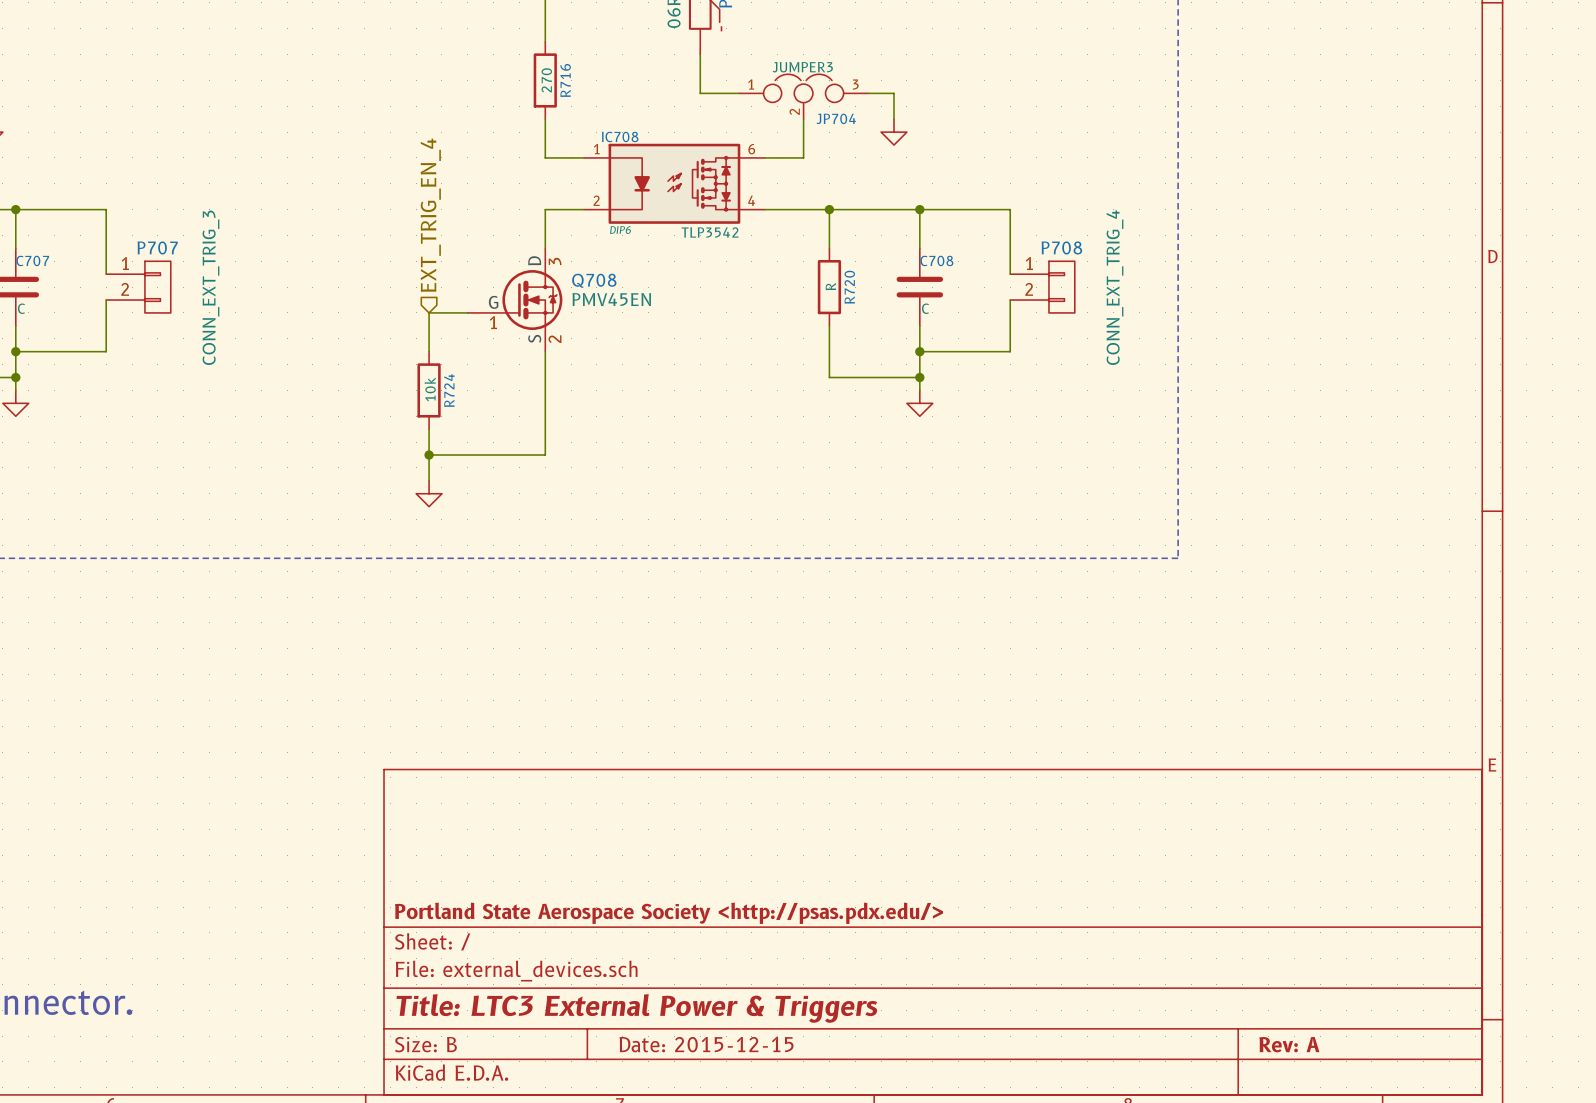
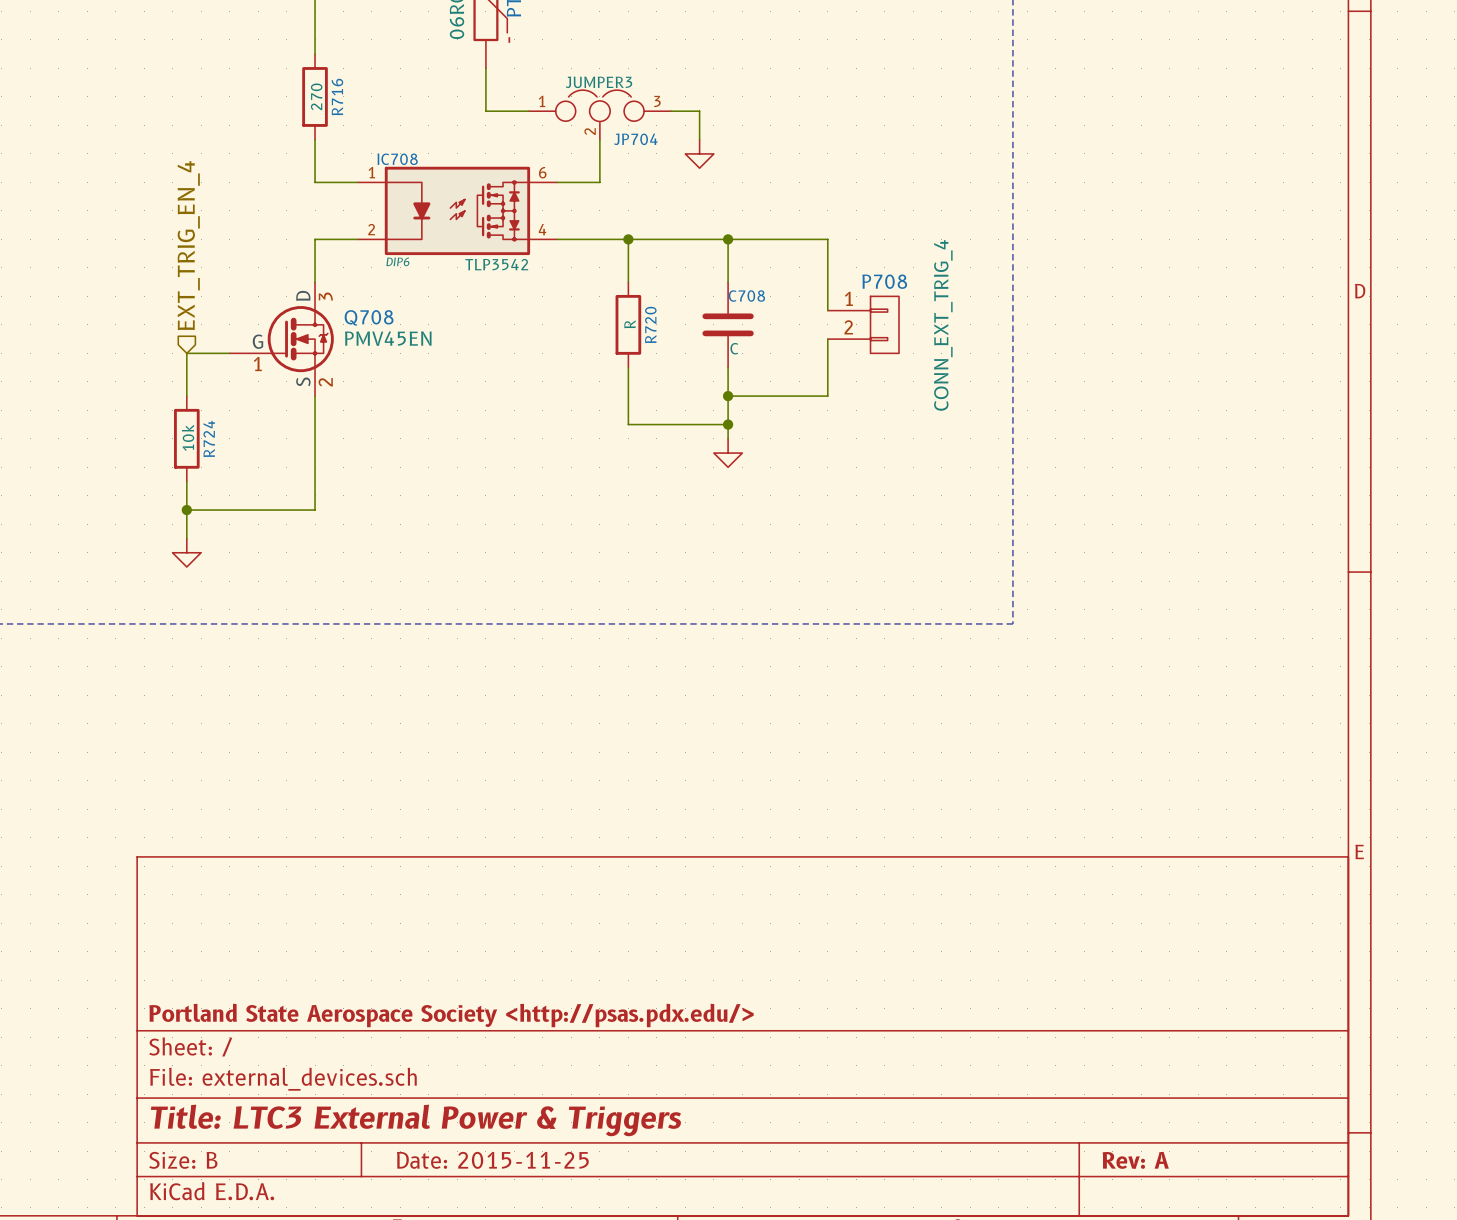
title block: Date: 2015-12-15 (706, 1044) -> Date: 2015-11-25 (492, 1160)

